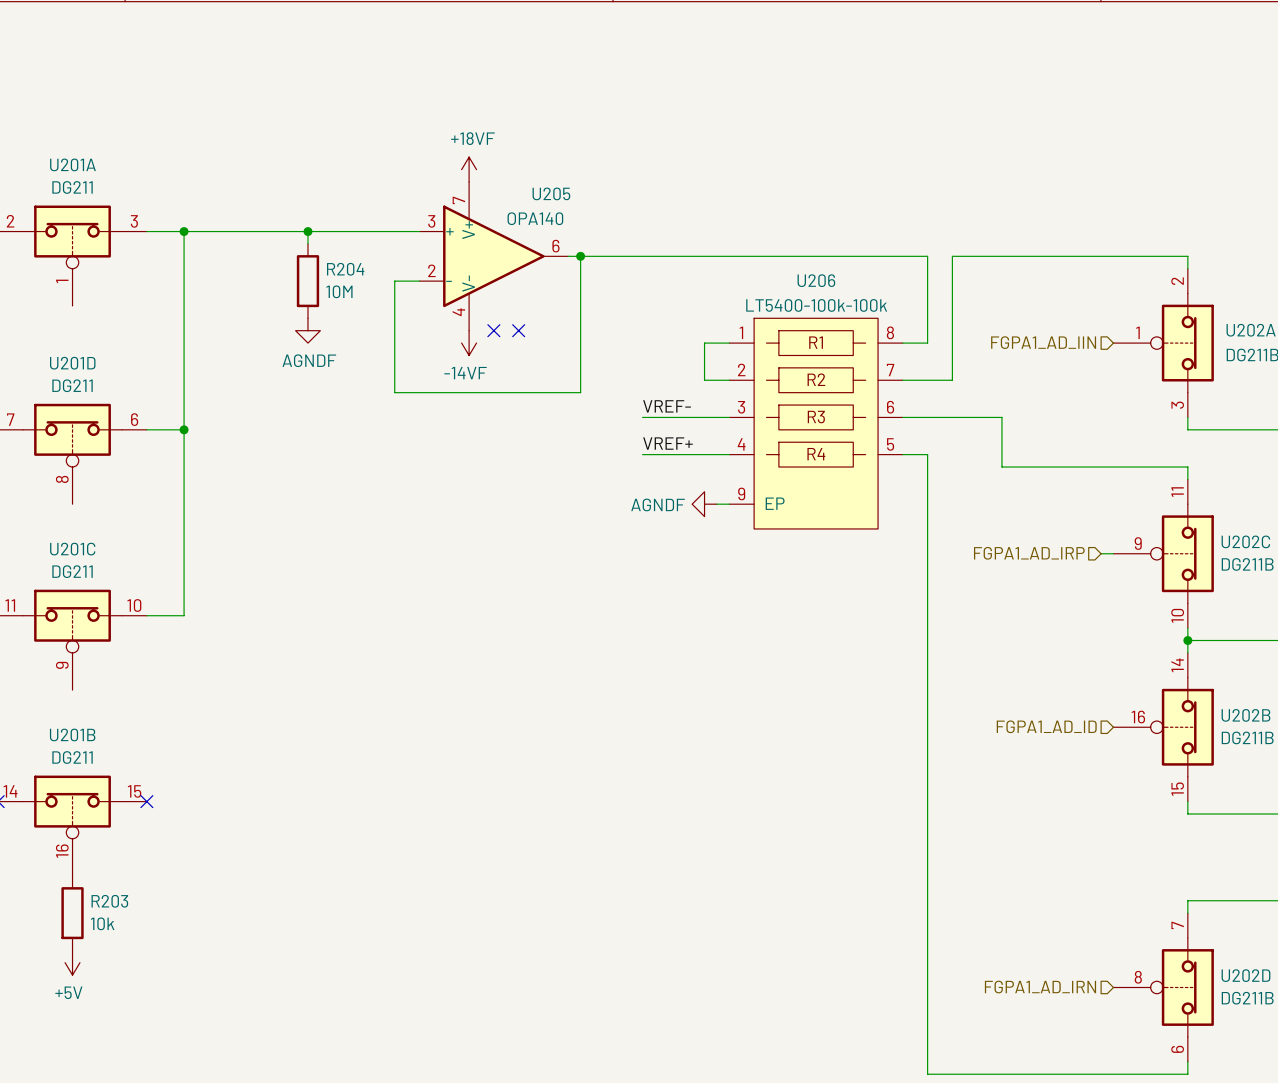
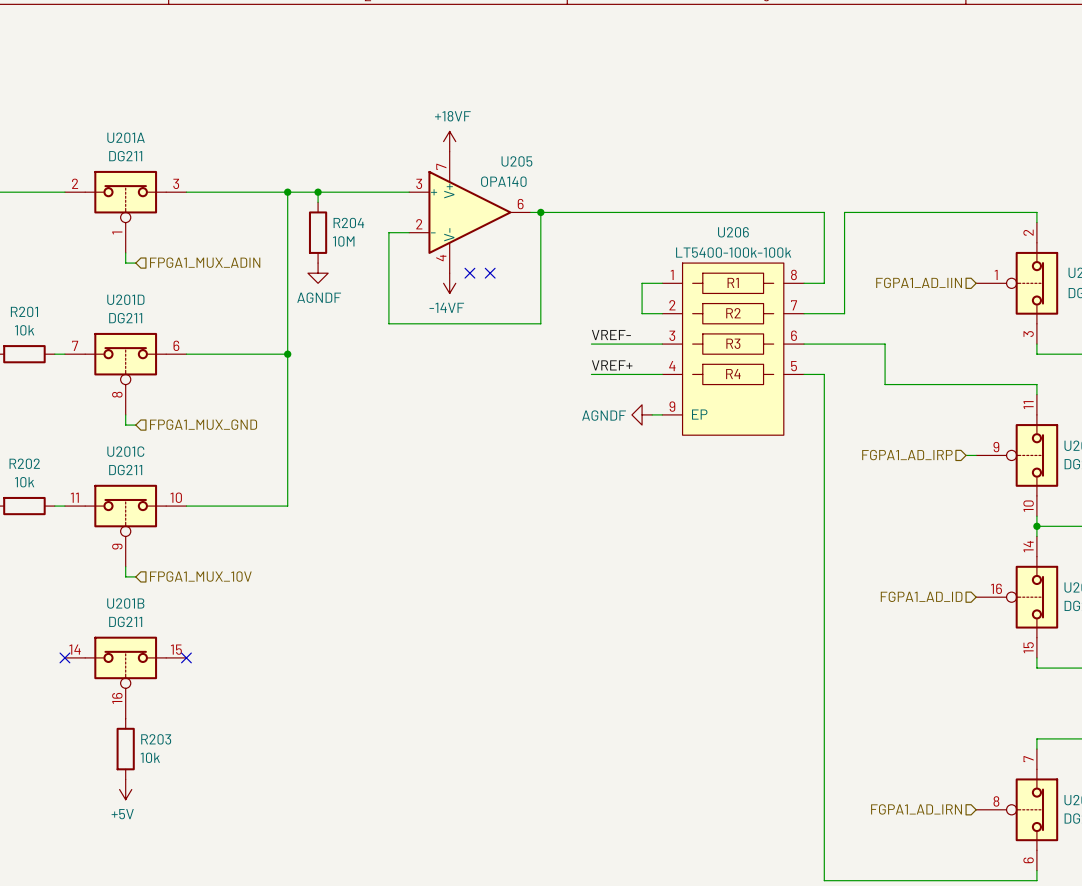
wire: (184, 231) (184, 615) -> (287, 192) (287, 506) (216, 506)
junction: (184, 231) -> none
junction: none -> (287, 192)
wire: none -> (125, 252) (125, 263) (135, 263)
hierarchical label: none -> FPGA1_MUX_ADIN (205, 262)
wire: none -> (216, 354) (287, 354)
junction: (184, 429) -> none
junction: none -> (287, 354)
wire: none -> (125, 414) (125, 425) (135, 425)
hierarchical label: none -> FPGA1_MUX_GND (203, 424)
wire: none -> (125, 566) (125, 576) (135, 576)
hierarchical label: none -> FPGA1_MUX_10V (200, 576)

